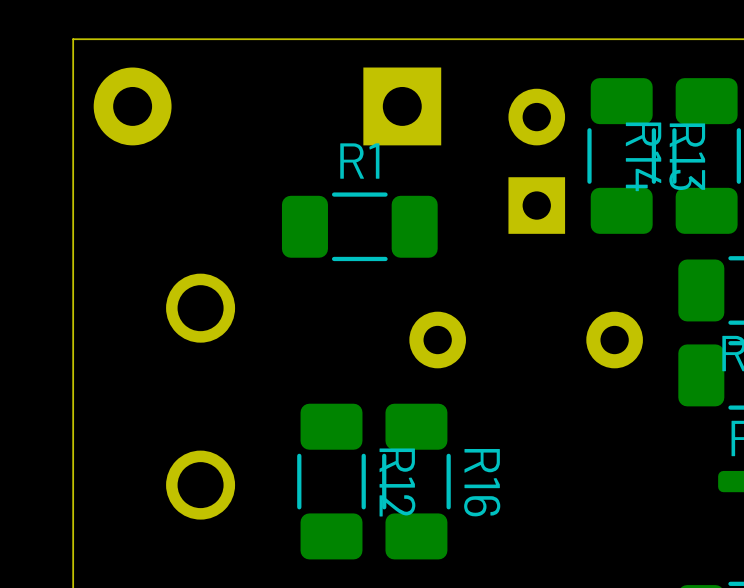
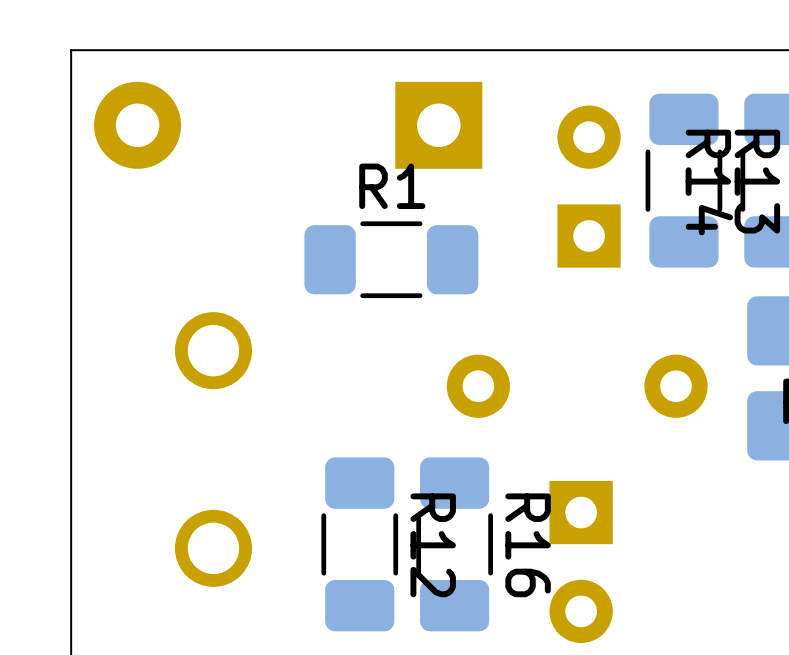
part: none -> (581, 561)

